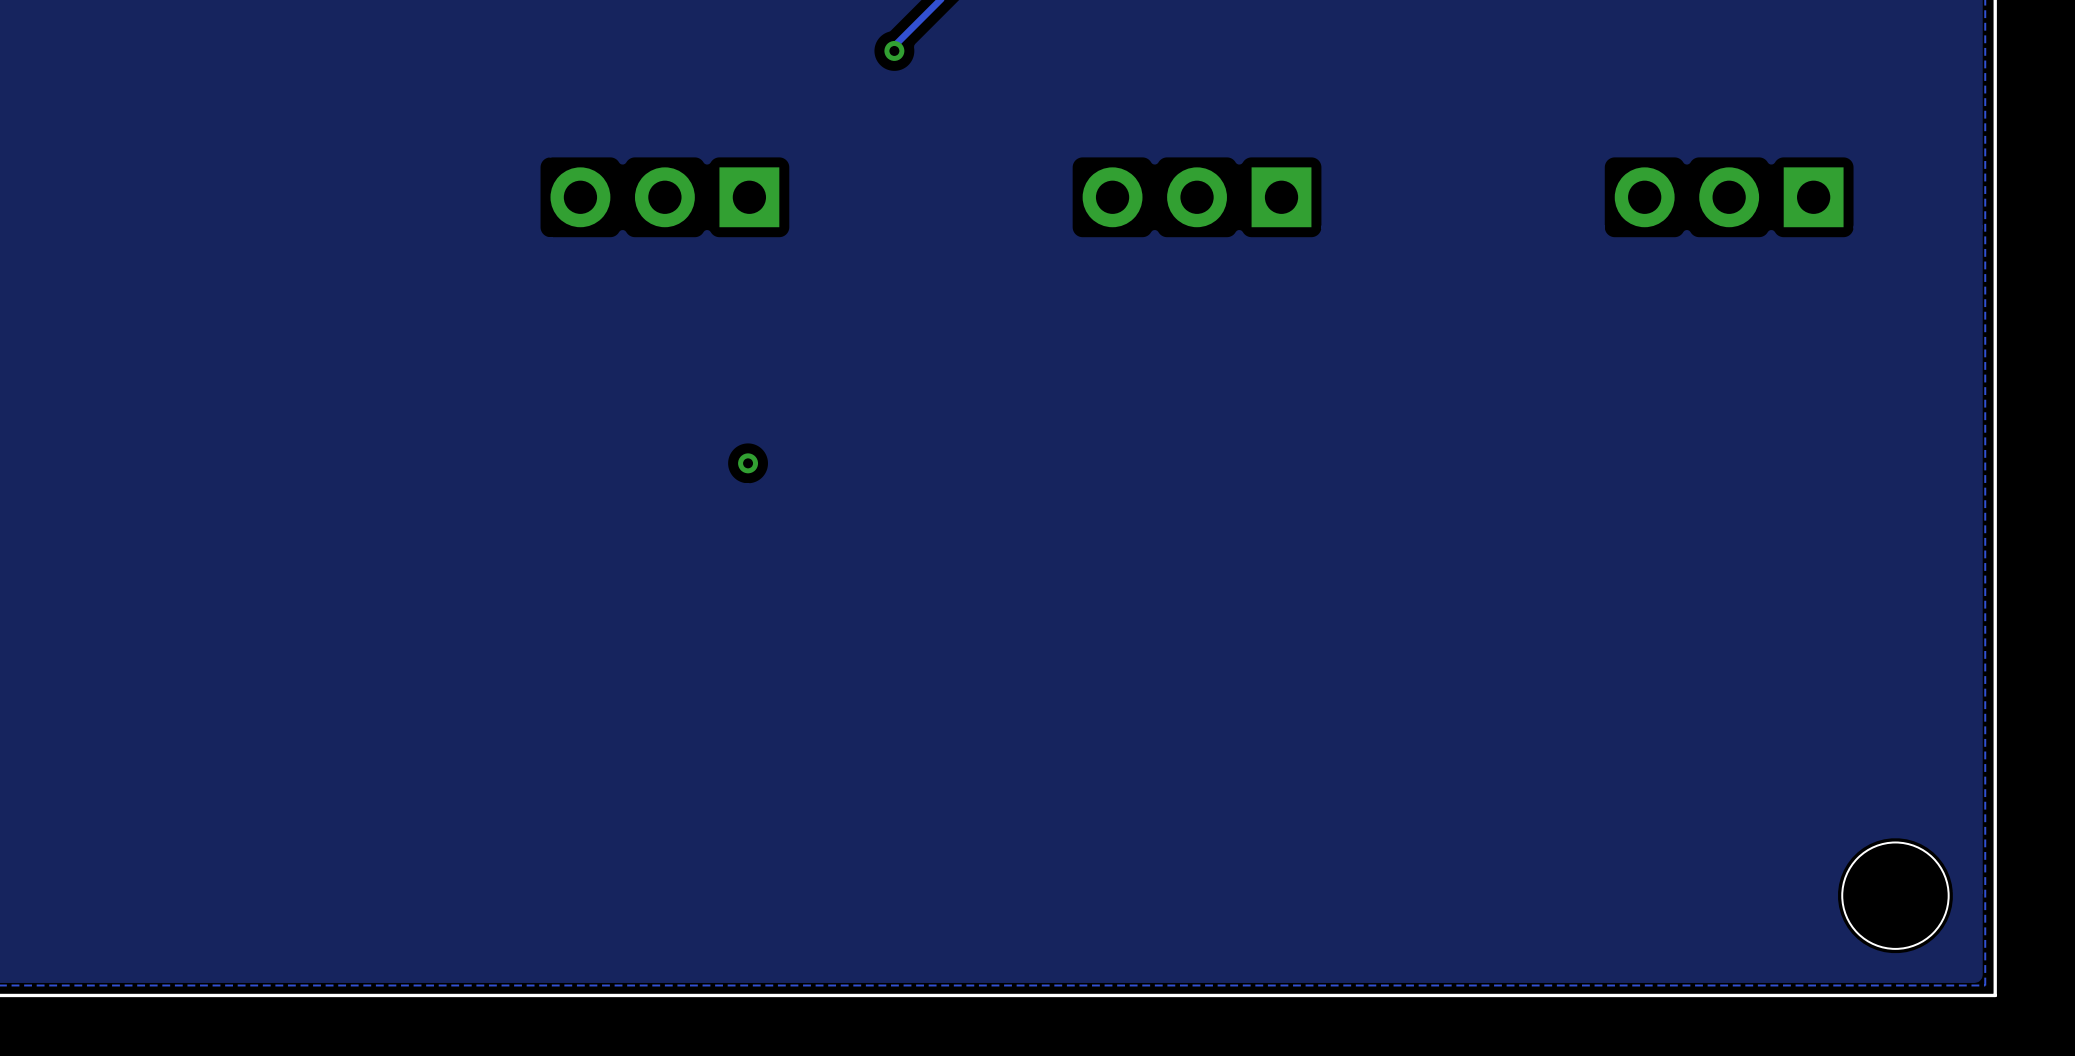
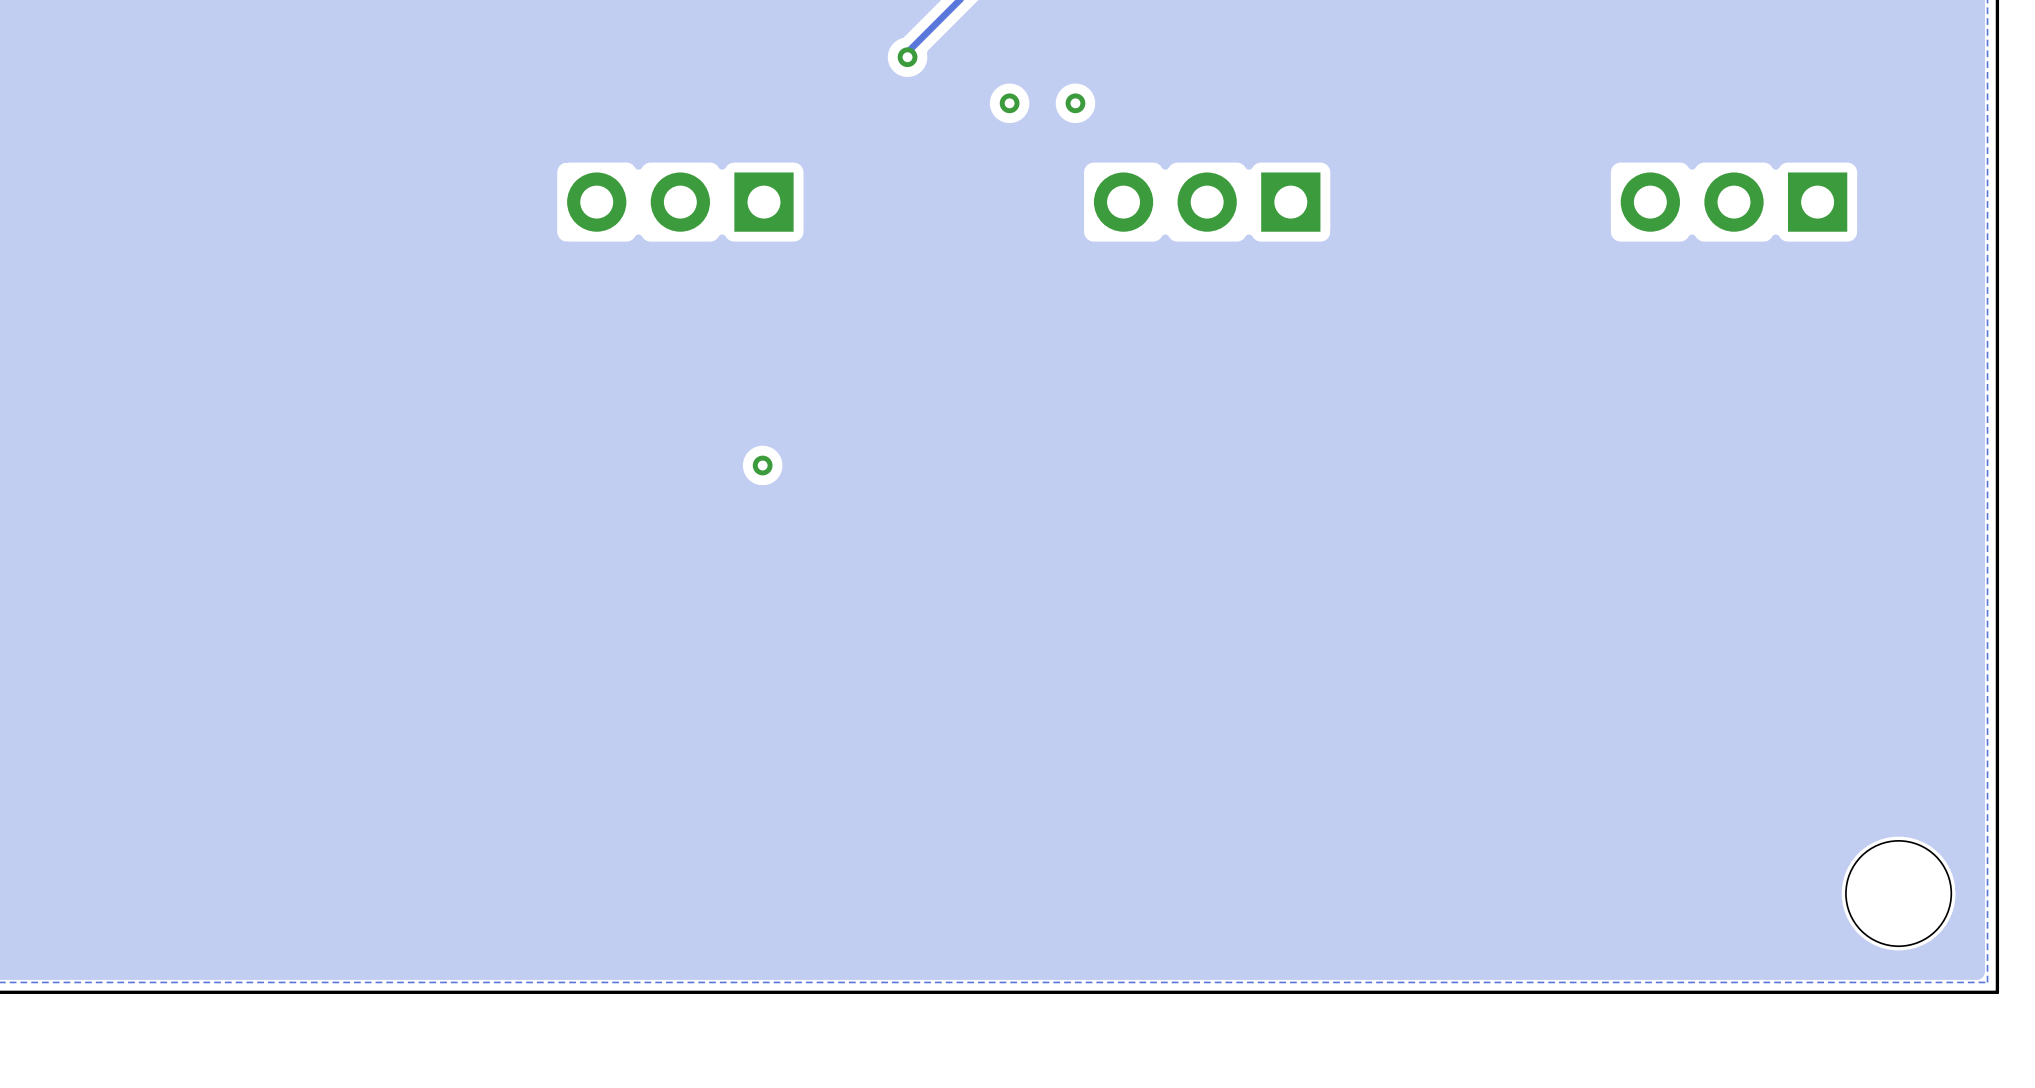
via: none -> (1009, 103)
via: none -> (1075, 103)

